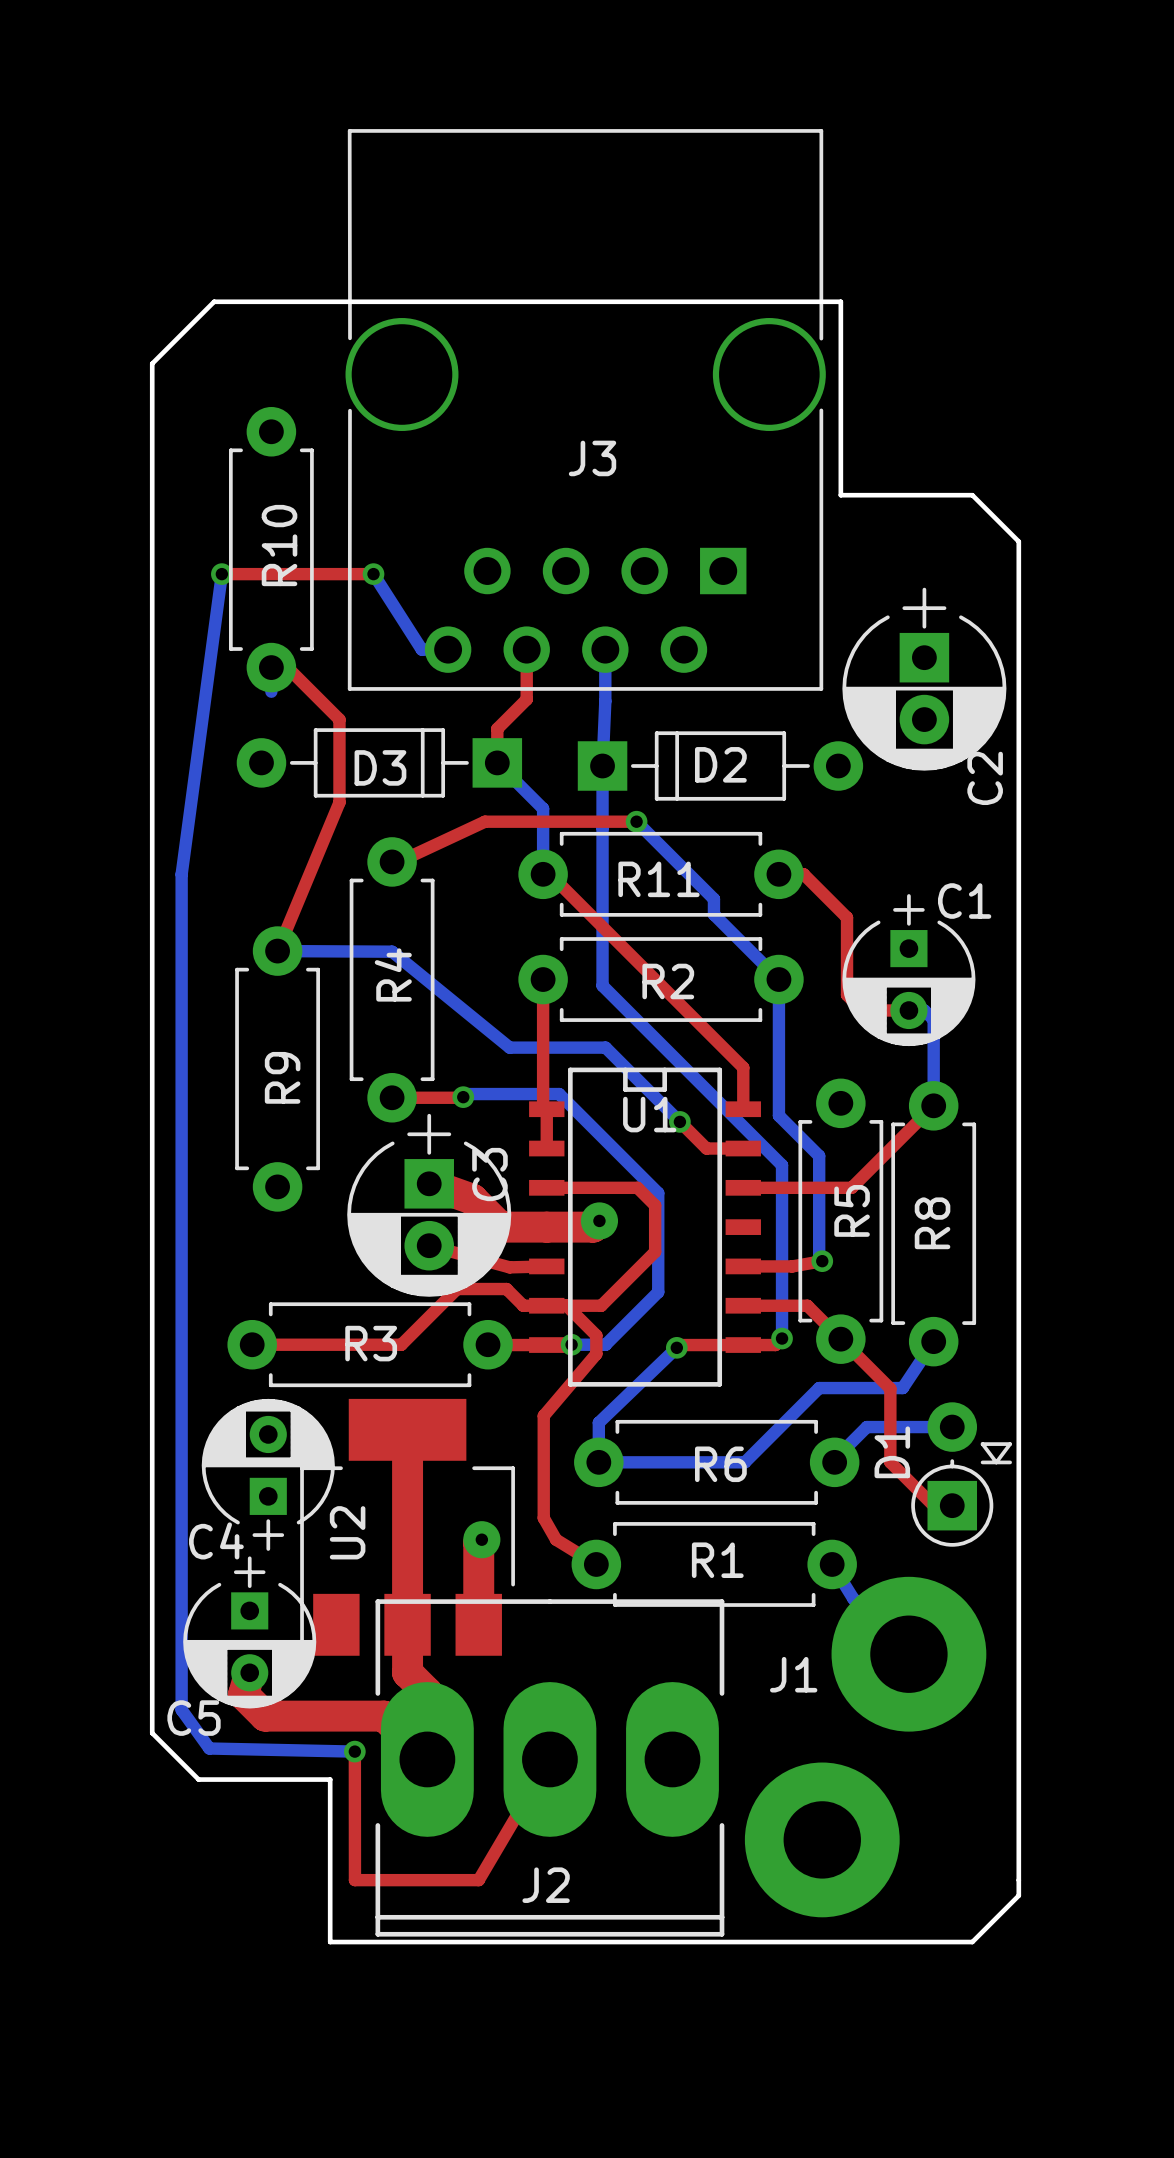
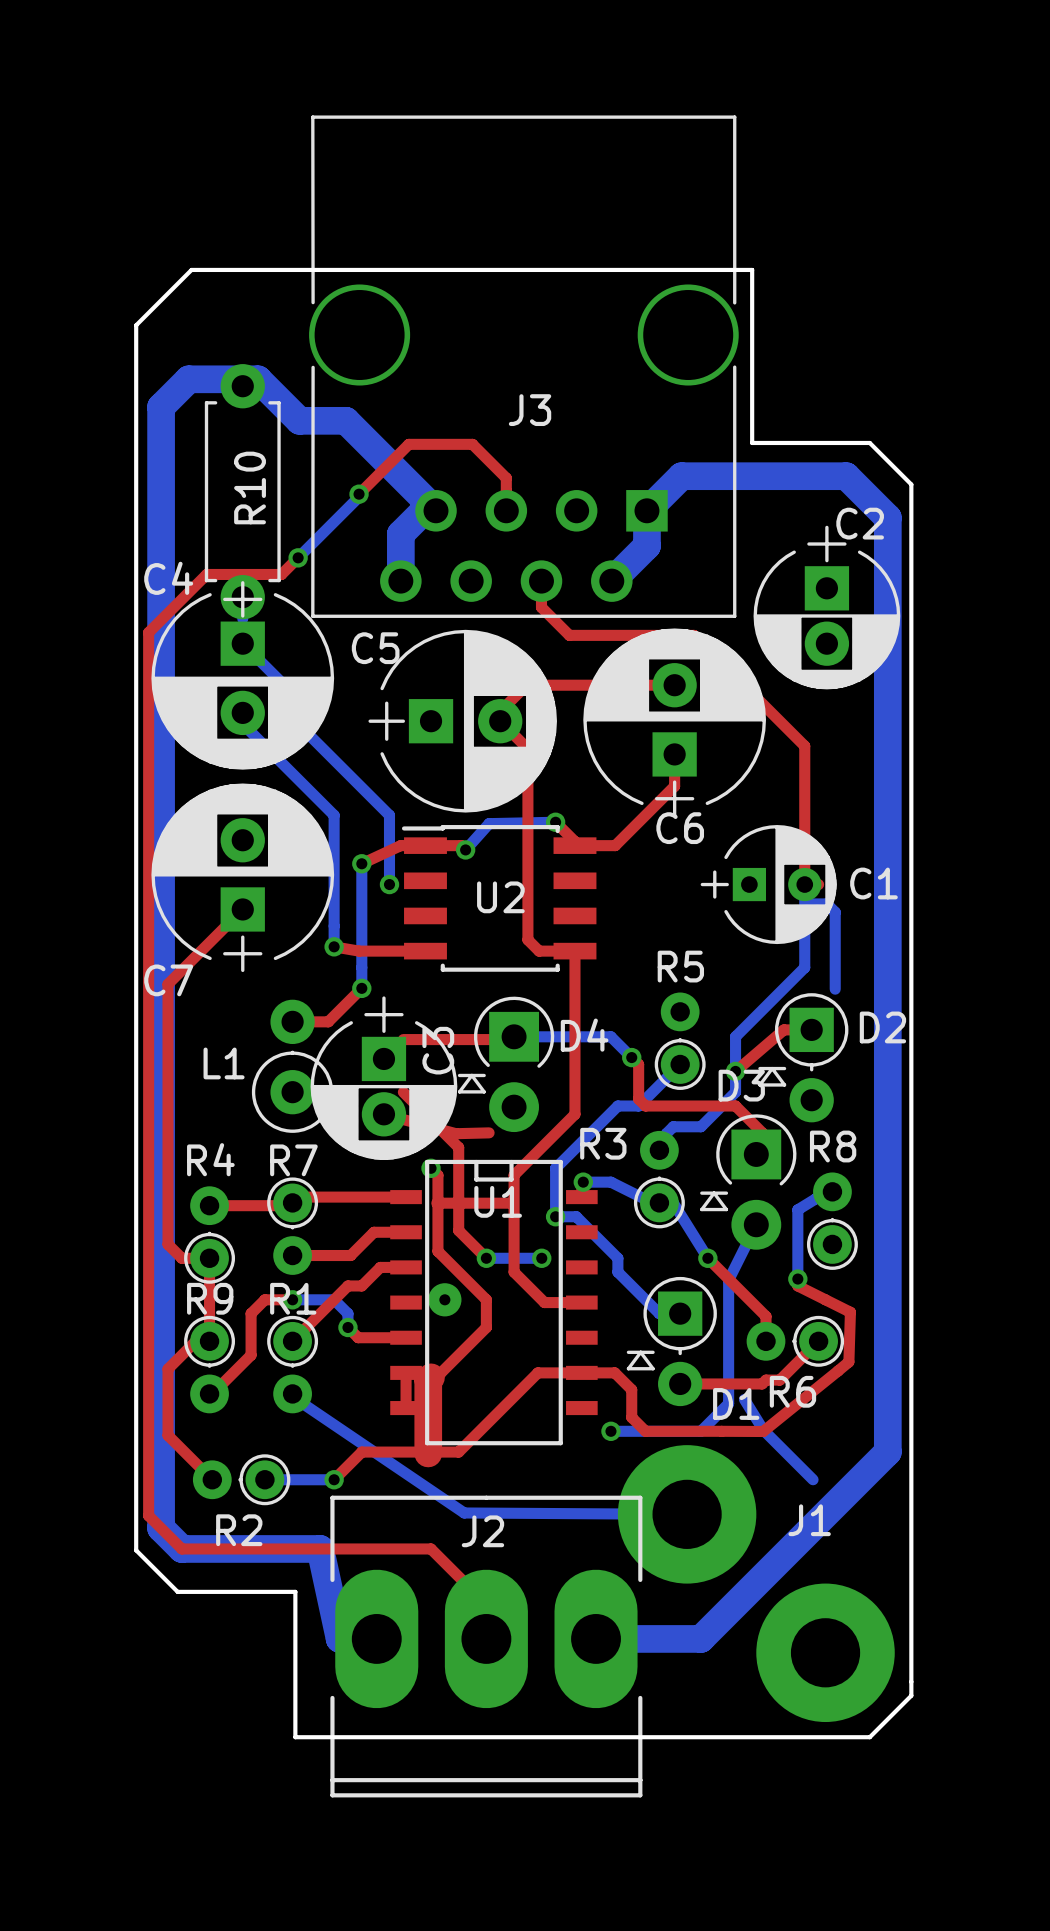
bottom track: none -> (359, 494) (359, 496) (298, 557)
top track: none -> (359, 494) (408, 444) (472, 444) (506, 478) (506, 510)
via: none -> (359, 494)
bottom track: (221, 574) (181, 874) (181, 1709) (209, 1748) (354, 1751) -> none
top track: (221, 574) (373, 574) -> none
via: (221, 574) -> none
bottom track: (373, 574) (421, 649) (448, 649) -> (376, 1638) (339, 1638) (320, 1548) (181, 1548) (161, 1528) (161, 406) (188, 379) (257, 379) (299, 420) (346, 420) (436, 510) (424, 510) (400, 534) (400, 581)
via: (373, 574) -> none
top track: none -> (298, 557) (281, 574) (206, 574) (148, 632) (148, 1515) (181, 1548) (431, 1548) (486, 1604) (486, 1638)
via: none -> (298, 557)
top track: (526, 649) (526, 699) (497, 728) (497, 762) -> none
top track: none -> (541, 581) (541, 607) (569, 635) (694, 635) (804, 746) (804, 884) (818, 884)
bottom track: none -> (611, 581) (646, 545) (646, 510) (681, 476) (846, 476) (887, 517) (887, 1452) (700, 1638) (596, 1638)
top track: (271, 667) (287, 667) (339, 719) (339, 802) (277, 951) -> none
bottom track: (605, 671) (602, 766) (602, 985) (782, 1165) (782, 1338) -> none
bottom track: none -> (242, 643) (292, 693) (292, 718) (389, 815) (389, 884)
D3 footprint: [236, 728, 523, 798] -> [700, 1114, 797, 1250]
D2 footprint: [577, 731, 864, 801] -> [758, 993, 849, 1123]
bottom track: (497, 762) (543, 808) (543, 874) -> none
D2 name position: D2 (720, 764) -> D2 (882, 1027)
top track: none -> (674, 685) (526, 685) (500, 711) (500, 721) (527, 748) (527, 939) (539, 951) (574, 951) (574, 1114) (514, 1175) (514, 1272) (544, 1302) (581, 1302)
D3 name position: D3 (380, 767) -> D3 (741, 1085)
C2 name rotation: 0° (985, 778) -> 90° clockwise (860, 523)
C2 name position: C2 (985, 778) -> C2 (860, 523)
bottom track: none -> (242, 712) (242, 723) (334, 815) (334, 946)
C6: none -> (674, 722)
bottom track: (636, 821) (713, 899) (713, 914) (778, 979) (778, 1115) (819, 1155) (819, 1258) (822, 1261) -> none
top track: (636, 821) (484, 821) (392, 865) (392, 861) -> none
via: (636, 821) -> none
R4 footprint: [349, 837, 435, 1123] -> [184, 1186, 236, 1284]
top track: none -> (674, 754) (674, 786) (615, 845) (574, 845) (574, 841) (555, 822)
top track: (543, 874) (549, 874) (743, 1067) (743, 1109) -> none
R11: (661, 874) -> none
top track: (778, 874) (803, 874) (847, 917) (847, 995) (862, 1010) (908, 1010) -> none
C1 name position: C1 (964, 901) -> C1 (873, 883)
bottom track: none -> (555, 822) (489, 823) (465, 849)
via: none -> (555, 822)
R9 footprint: [235, 926, 320, 1212] -> [184, 1315, 236, 1414]
R2 footprint: [518, 937, 804, 1022] -> [192, 1454, 291, 1506]
top track: none -> (465, 849) (461, 845) (400, 845) (361, 863)
via: none -> (465, 849)
bottom track: (277, 951) (392, 951) (509, 1047) (605, 1047) (679, 1121) -> none
bottom track: none -> (361, 863) (361, 988)
via: none -> (361, 863)
C1 rotation: 0° (908, 970) -> 90° counterclockwise (768, 884)
R4 name position: R4 (393, 974) -> R4 (210, 1159)
top track: (543, 979) (543, 1105) (546, 1109) (546, 1148) -> none
C7: none -> (242, 877)
via: none -> (389, 884)
bottom track: none -> (804, 884) (804, 967) (735, 1036) (735, 1092) (700, 1126) (673, 1126) (666, 1133) (659, 1150)
top track: none -> (242, 909) (168, 984) (168, 1244) (181, 1258) (209, 1258) (209, 1341) (195, 1341) (168, 1369) (168, 1435) (212, 1479)
top track: none -> (334, 946) (359, 951) (425, 951)
via: none -> (334, 946)
R9 name position: R9 (282, 1077) -> R9 (210, 1298)
R5 footprint: [798, 1078, 884, 1364] -> [654, 992, 706, 1090]
R8 footprint: [891, 1081, 977, 1367] -> [806, 1172, 858, 1270]
bottom track: (463, 1097) (466, 1094) (559, 1094) (658, 1193) (658, 1292) (605, 1344) (571, 1344) -> none
top track: (463, 1097) (392, 1097) -> none
via: (463, 1097) -> none
top track: none -> (361, 988) (328, 1021) (292, 1021)
via: none -> (361, 988)
top track: (933, 1105) (851, 1187) (743, 1187) -> none
top track: (679, 1121) (706, 1148) (743, 1148) -> none
via position: (679, 1121) -> (631, 1057)
top track: none -> (811, 1029) (784, 1029) (735, 1071)
bottom track: none -> (514, 1036) (610, 1036) (631, 1057)
top track: none -> (514, 1036) (511, 1039) (403, 1039)
top track: none -> (631, 1057) (638, 1064) (638, 1099) (645, 1106) (735, 1106) (763, 1133) (756, 1154)
top track: (429, 1183) (472, 1199) (500, 1227) (593, 1227) (599, 1220) -> none
top track: (546, 1187) (637, 1187) (655, 1205) (655, 1251) (601, 1305) (523, 1305) (506, 1289) (457, 1289) (401, 1344) (252, 1344) -> none
D4: none -> (506, 1064)
bottom track: none -> (680, 1064) (638, 1106) (617, 1106) (555, 1168) (555, 1216) (576, 1216) (617, 1258) (617, 1272) (659, 1313) (680, 1313)
L1: none -> (292, 1066)
R5 name position: R5 (852, 1210) -> R5 (680, 966)
top track: none -> (403, 1092) (458, 1147) (458, 1230) (486, 1258)
via: (599, 1220) -> none
R8 name position: R8 (932, 1223) -> R8 (833, 1146)
U1 position: (645, 1227) -> (493, 1302)
top track: (822, 1261) (792, 1266) (743, 1266) -> none
via position: (822, 1261) -> (735, 1071)
R3 footprint: [227, 1302, 513, 1388] -> [633, 1130, 685, 1229]
top track: (566, 1305) (596, 1335) (596, 1354) (543, 1415) (543, 1453) -> (431, 1168) (437, 1175) (437, 1251) (486, 1299)
top track: (743, 1305) (807, 1305) (890, 1388) (890, 1462) (933, 1505) (952, 1505) -> none
via: none -> (431, 1168)
bottom track: none -> (583, 1182) (610, 1182) (652, 1202) (673, 1202) (707, 1258)
via: none -> (583, 1182)
bottom track: none -> (832, 1191) (815, 1198) (797, 1209) (797, 1279)
top track: none -> (406, 1197) (298, 1197) (289, 1205) (209, 1205)
top track: (782, 1338) (775, 1345) (676, 1345) (676, 1347) -> none
via: (782, 1338) -> none
bottom track: (933, 1341) (902, 1388) (819, 1388) (744, 1462) (598, 1462) (598, 1422) (676, 1347) -> none
R3 name position: R3 (371, 1343) -> R3 (603, 1143)
via: (571, 1344) -> none
via: (676, 1347) -> none
via: none -> (555, 1216)
bottom track: none -> (756, 1224) (728, 1280) (728, 1403) (700, 1431) (610, 1431)
R7: none -> (292, 1226)
top track: none -> (406, 1232) (373, 1232) (350, 1255) (292, 1255)
C4 footprint: [201, 1398, 335, 1551] -> [151, 581, 335, 770]
U2 footprint: [300, 1398, 515, 1657] -> [401, 825, 597, 972]
bottom track: none -> (486, 1258) (541, 1258)
via: none -> (486, 1258)
via: none -> (541, 1258)
top track: none -> (707, 1258) (766, 1316) (766, 1341)
via: none -> (707, 1258)
top track: none -> (406, 1267) (380, 1267) (361, 1285) (347, 1285) (292, 1341)
R6 footprint: [574, 1419, 860, 1505] -> [746, 1315, 845, 1367]
bottom track: (952, 1427) (866, 1427) (834, 1459) (834, 1462) -> none
top track: (407, 1429) (407, 1672) (427, 1692) (427, 1759) (384, 1716) (265, 1716) (243, 1694) (249, 1672) -> none
top track: none -> (797, 1279) (797, 1285) (850, 1312) (848, 1361) (763, 1431) (645, 1431) (631, 1417) (631, 1389) (614, 1372) (537, 1372) (458, 1452) (361, 1452) (334, 1479)
via: none -> (797, 1279)
bottom track: none -> (292, 1299) (334, 1299) (347, 1313) (347, 1327)
top track: none -> (292, 1299) (264, 1299) (251, 1313) (251, 1355) (212, 1393) (209, 1393)
via: none -> (292, 1299)
D1 rotation: 0° (961, 1474) -> 180° (671, 1341)
D1 position: (961, 1474) -> (671, 1341)
top track: none -> (347, 1327) (358, 1337) (406, 1337)
via: none -> (347, 1327)
top track: (543, 1484) (543, 1518) (556, 1539) (596, 1564) -> (486, 1327) (440, 1372) (406, 1372) (406, 1408)
top track: none -> (818, 1341) (779, 1380) (766, 1380) (762, 1383) (680, 1383)
R1 footprint: [571, 1522, 857, 1607] -> [267, 1315, 319, 1414]
via position: (481, 1539) -> (444, 1299)
C4 name position: C4 (216, 1540) -> C4 (168, 578)
C5 footprint: [183, 1556, 317, 1709] -> [368, 629, 557, 813]
bottom track: none -> (292, 1393) (292, 1396) (464, 1512) (687, 1514)
R1 name position: R1 (717, 1560) -> R1 (293, 1298)
J1 footprint: [744, 1576, 987, 1918] -> [617, 1445, 895, 1723]
via: none -> (610, 1431)
bottom track: none -> (264, 1479) (334, 1479)
J1 name position: J1 (793, 1674) -> J1 (809, 1520)
C5 name position: C5 (194, 1718) -> C5 (375, 648)
top track: (354, 1751) (354, 1880) (478, 1880) (549, 1759) -> none
via position: (354, 1751) -> (334, 1479)
J2 position: (549, 1767) -> (486, 1646)
J2 name position: J2 (546, 1885) -> J2 (482, 1531)

